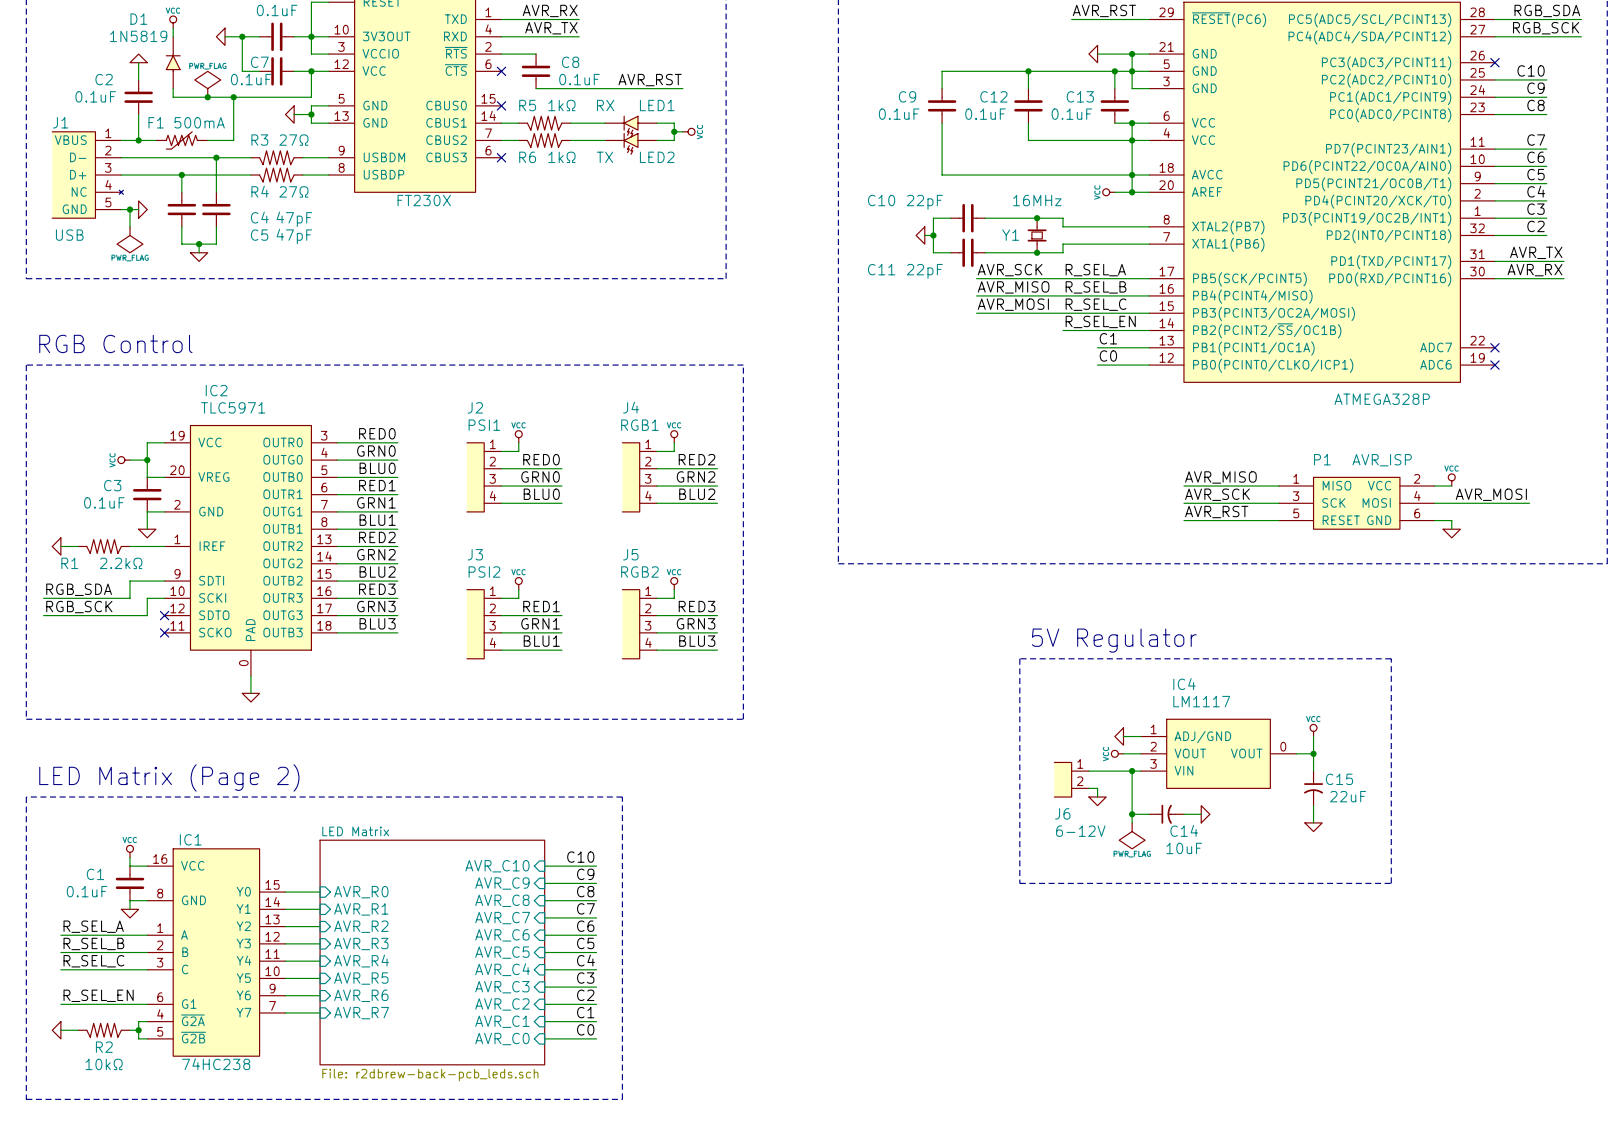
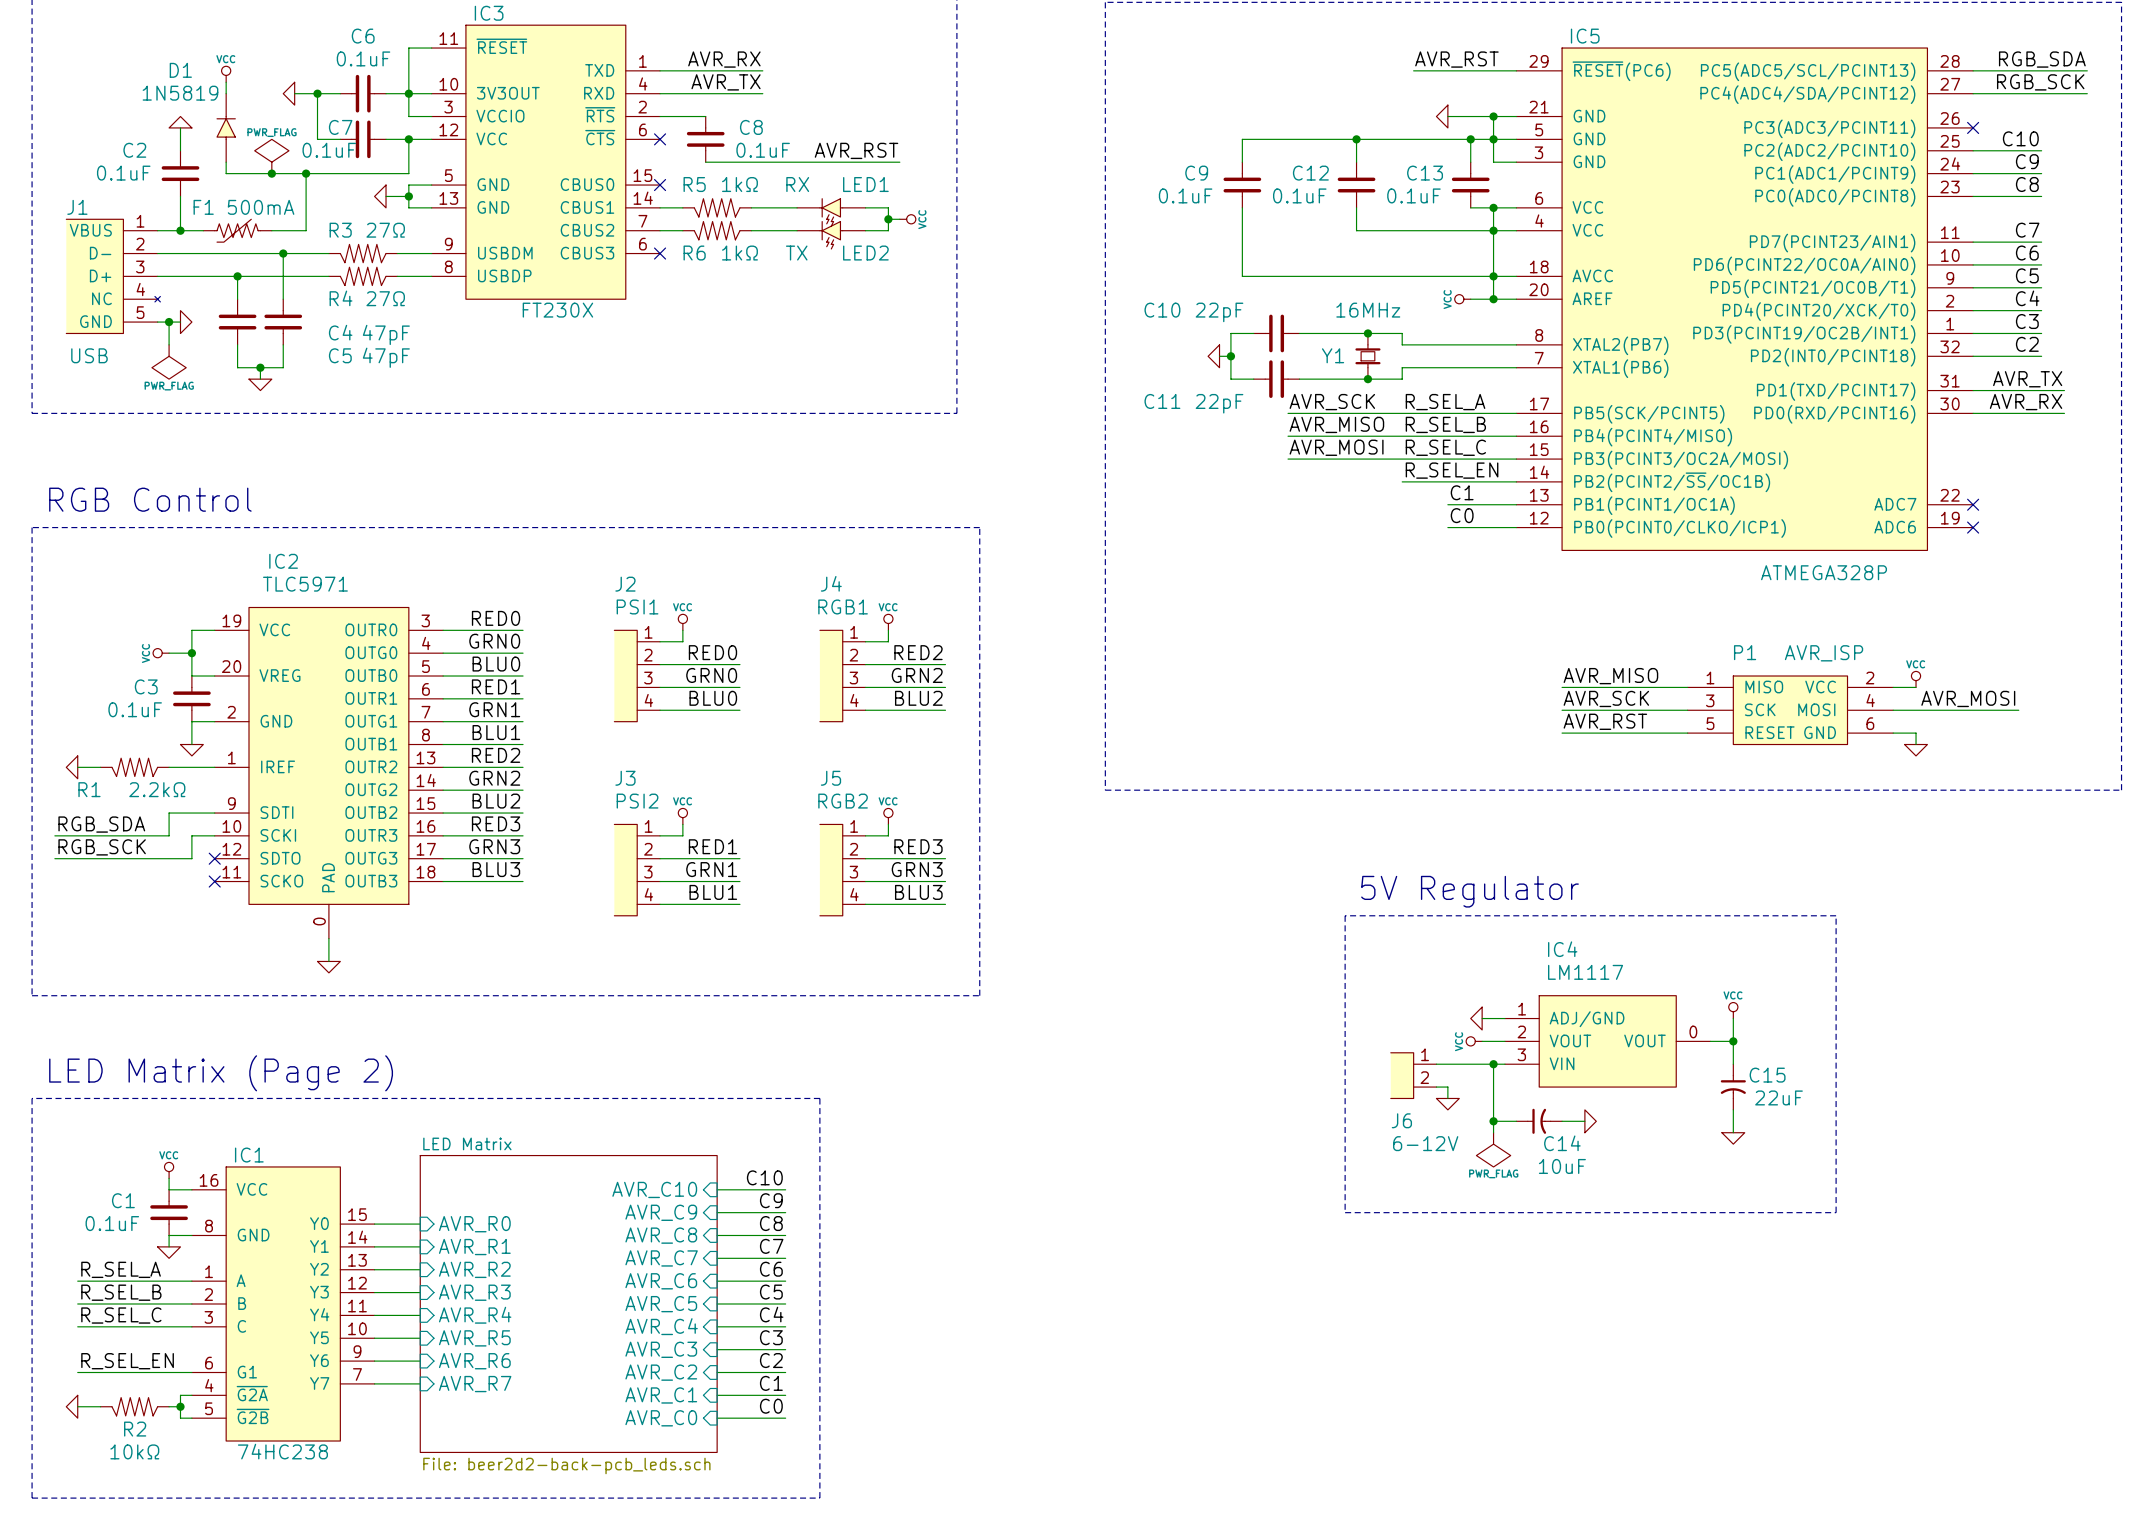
sheet LED Matrix value: File: r2dbrew-back-pcb_leds.sch (430, 1075) -> File: beer2d2-back-pcb_leds.sch (566, 1465)

